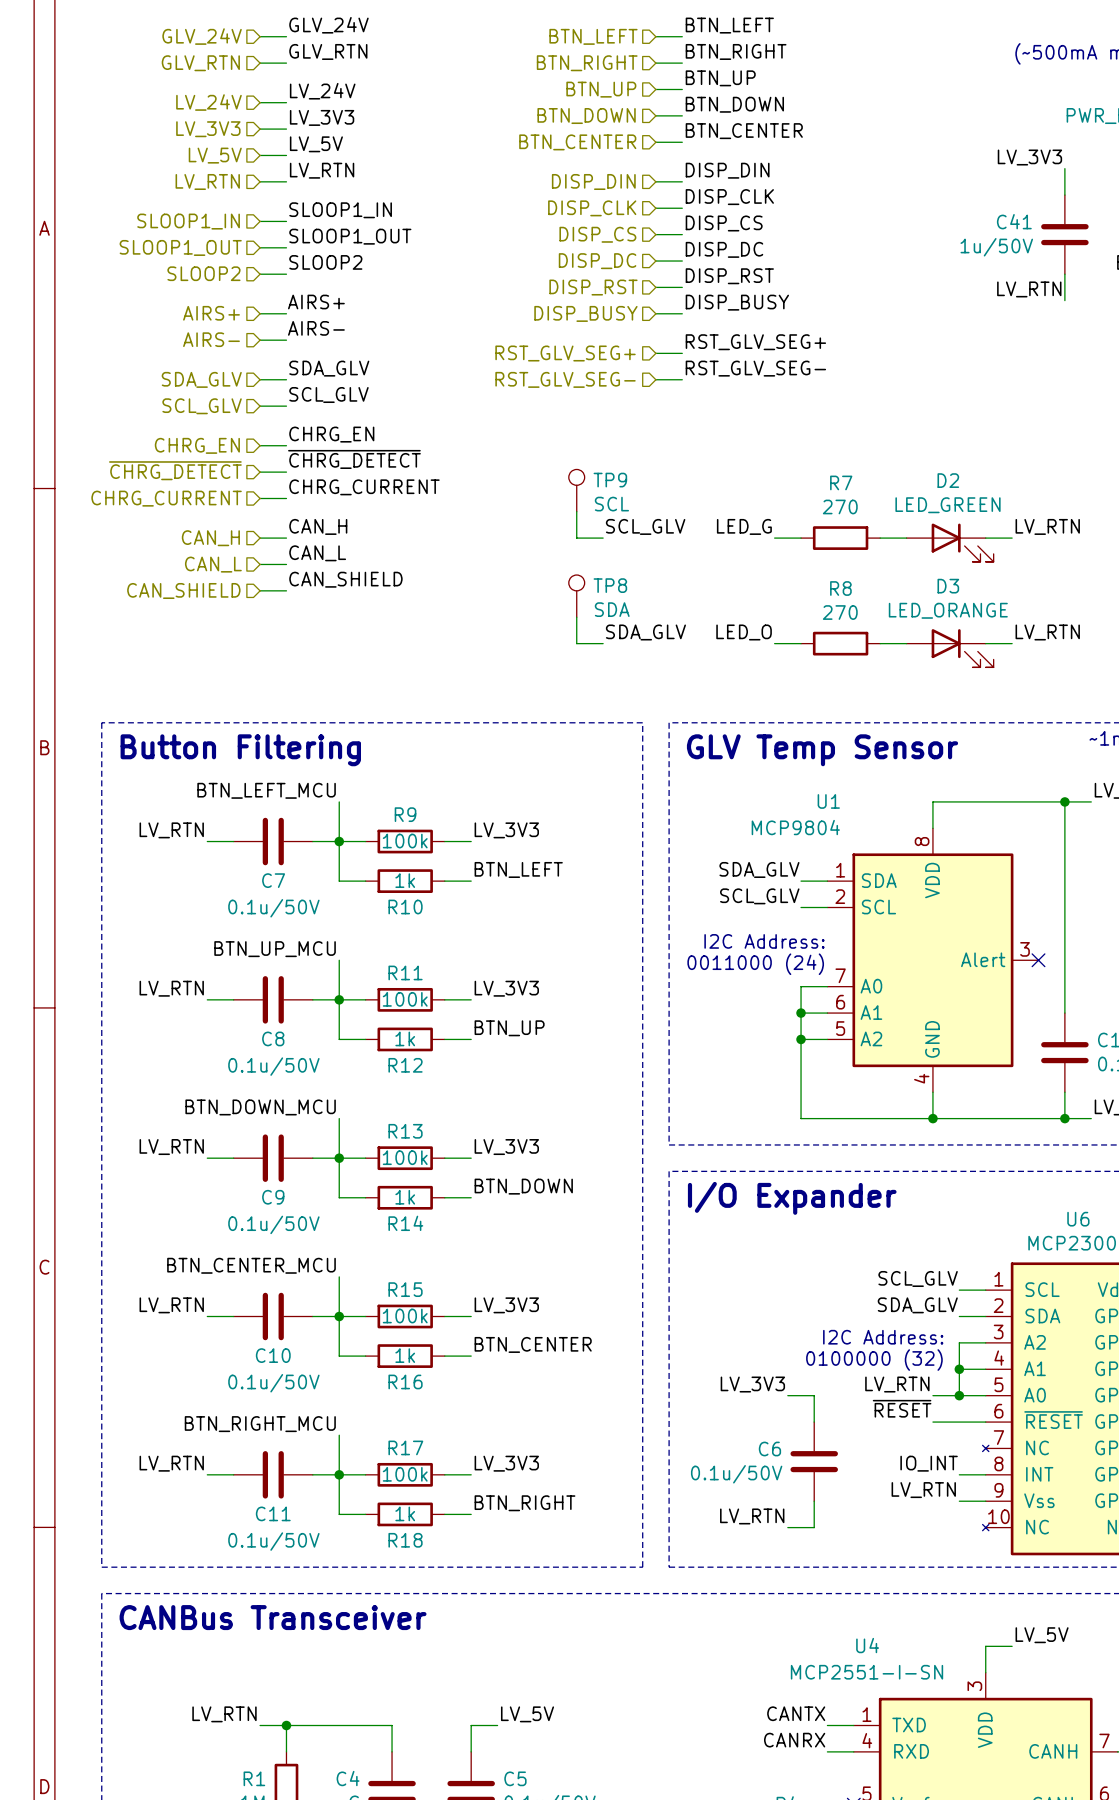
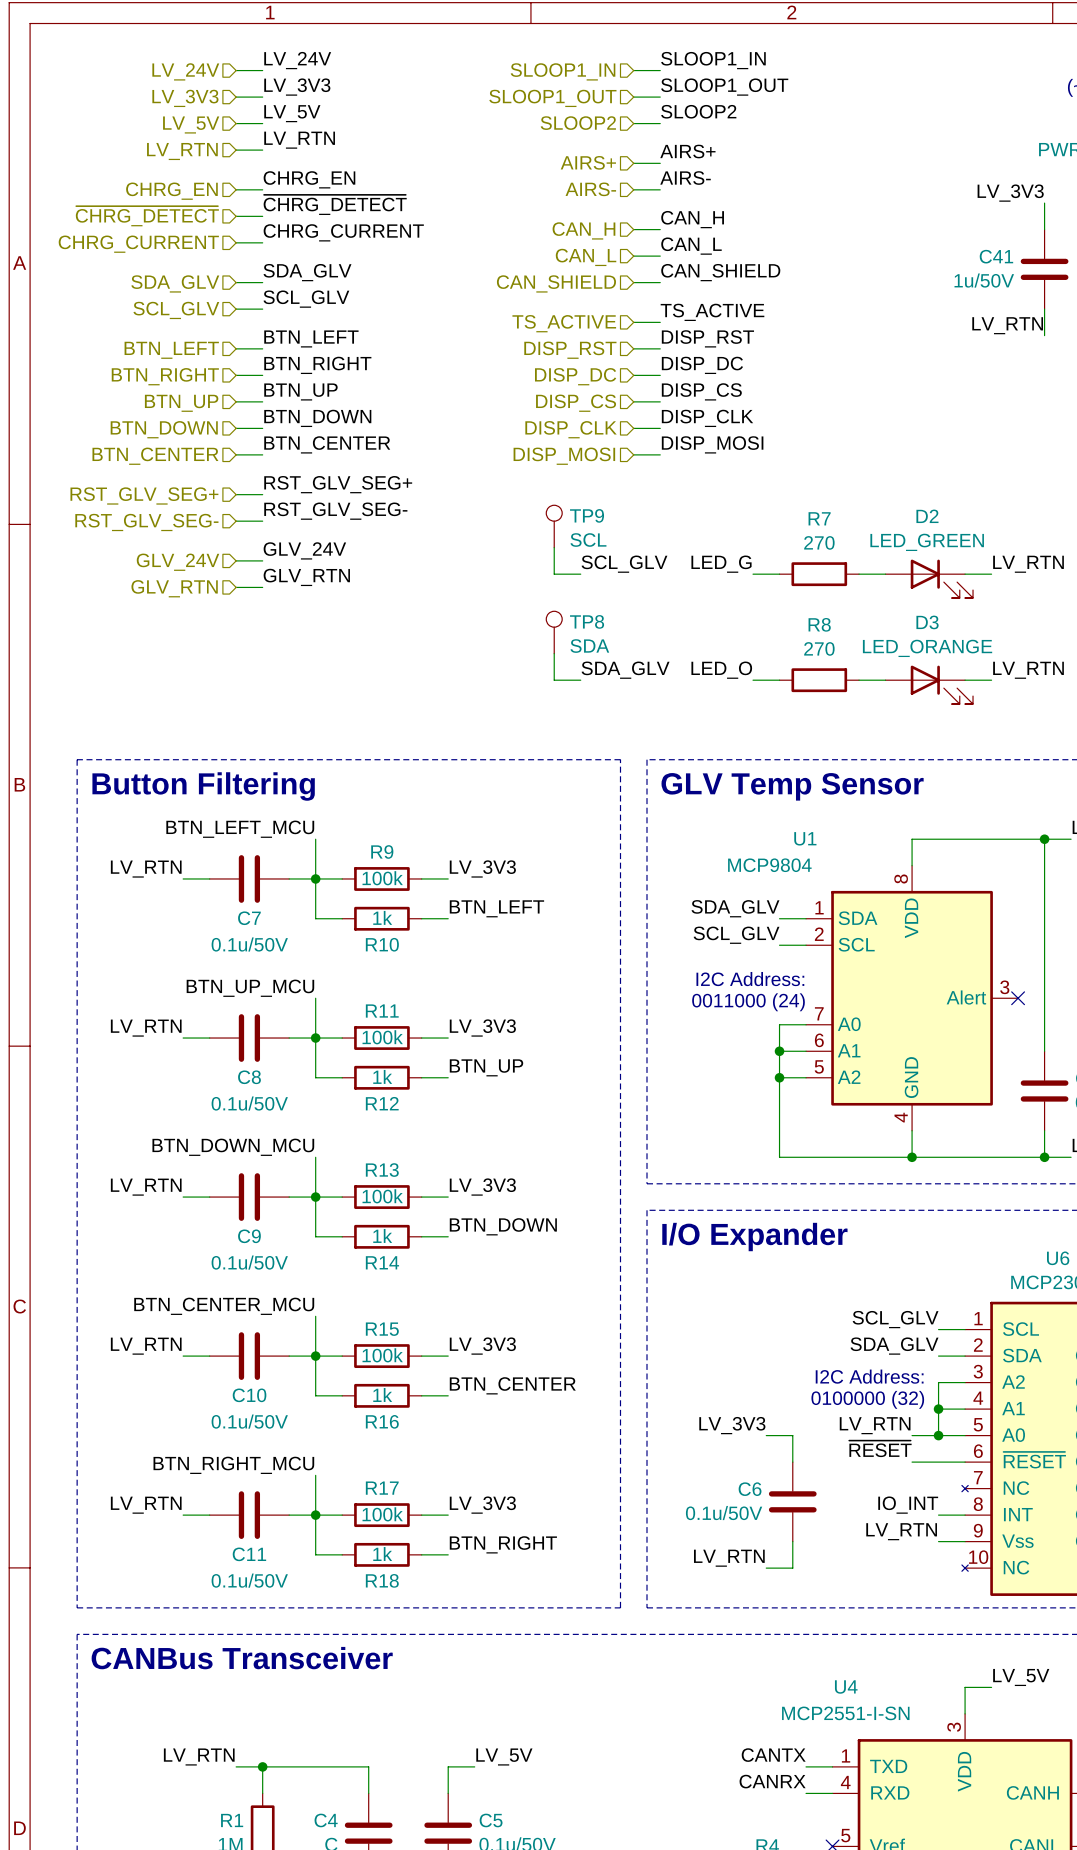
label: GLV_24V (328, 25) -> LV_24V (297, 60)
label: BTN_LEFT (729, 25) -> SLOOP1_IN (713, 60)
hierarchical label: GLV_24V (202, 36) -> LV_24V (185, 71)
hierarchical label: BTN_LEFT (593, 36) -> SLOOP1_IN (563, 71)
label: GLV_RTN (328, 51) -> LV_3V3 (297, 87)
label: BTN_RIGHT (736, 51) -> SLOOP1_OUT (724, 87)
hierarchical label: GLV_RTN (200, 63) -> LV_3V3 (185, 98)
hierarchical label: BTN_RIGHT (587, 63) -> SLOOP1_OUT (552, 98)
label: BTN_UP (720, 78) -> SLOOP2 (698, 111)
hierarchical label: BTN_UP (601, 89) -> SLOOP2 (578, 123)
label: LV_24V (322, 91) -> LV_5V (292, 113)
hierarchical label: LV_24V (208, 102) -> LV_5V (191, 125)
wire: (260, 102) (286, 102) -> (236, 123) (262, 123)
label: none -> LV_RTN (299, 140)
label: BTN_DOWN (734, 104) -> none
wire: (655, 115) (682, 115) -> (633, 189) (660, 189)
hierarchical label: none -> LV_RTN (182, 151)
hierarchical label: BTN_DOWN (586, 116) -> none
label: LV_3V3 (322, 117) -> none
label: none -> AIRS+ (687, 151)
hierarchical label: none -> AIRS+ (588, 162)
hierarchical label: LV_3V3 (208, 129) -> none
wire: (260, 129) (286, 129) -> (236, 150) (262, 150)
label: BTN_CENTER (744, 131) -> none
hierarchical label: BTN_CENTER (577, 142) -> none
wire: (655, 142) (682, 142) -> (633, 163) (660, 163)
label: none -> AIRS- (685, 178)
label: LV_5V (316, 144) -> CHRG_EN (309, 179)
hierarchical label: none -> AIRS- (590, 189)
hierarchical label: LV_5V (215, 155) -> CHRG_EN (171, 191)
label: LV_RTN (322, 170) -> ~{CHRG_DETECT} (335, 204)
label: DISP_DIN (727, 170) -> none
hierarchical label: LV_RTN (207, 181) -> ~{CHRG_DETECT} (147, 216)
hierarchical label: DISP_DIN (593, 181) -> none
wire: (655, 181) (682, 181) -> (633, 454) (660, 454)
label: none -> CAN_H (692, 219)
hierarchical label: none -> CAN_H (583, 230)
label: none -> CHRG_CURRENT (343, 232)
label position: DISP_CLK (729, 197) -> DISP_CLK (707, 418)
hierarchical label: none -> CHRG_CURRENT (138, 244)
hierarchical label position: DISP_CLK (592, 208) -> DISP_CLK (571, 429)
wire: (655, 208) (682, 208) -> (633, 229) (660, 229)
label: SLOOP1_IN (340, 210) -> none
label: none -> CAN_L (691, 246)
hierarchical label: SLOOP1_IN (188, 221) -> none
wire: (260, 221) (286, 221) -> (236, 242) (262, 242)
hierarchical label: none -> CAN_L (586, 257)
label position: DISP_CS (724, 223) -> DISP_CS (701, 391)
hierarchical label position: DISP_CS (597, 234) -> DISP_CS (576, 403)
wire: (655, 234) (682, 234) -> (633, 256) (660, 256)
label: SLOOP1_OUT (350, 236) -> SDA_GLV (307, 272)
label: none -> CAN_SHIELD (720, 272)
hierarchical label: SLOOP1_OUT (180, 247) -> SDA_GLV (175, 283)
hierarchical label: none -> CAN_SHIELD (556, 283)
label position: DISP_DC (724, 249) -> DISP_DC (702, 365)
hierarchical label position: DISP_DC (597, 261) -> DISP_DC (575, 376)
wire: (655, 261) (682, 261) -> (633, 282) (660, 282)
label: SLOOP2 (325, 262) -> SCL_GLV (306, 299)
hierarchical label: SLOOP2 (203, 273) -> SCL_GLV (176, 310)
label: DISP_RST (729, 276) -> TS_ACTIVE (712, 312)
hierarchical label: DISP_RST (593, 287) -> TS_ACTIVE (564, 323)
label: AIRS+ (316, 302) -> BTN_LEFT (311, 338)
label: DISP_BUSY (737, 302) -> DISP_RST (707, 338)
hierarchical label: AIRS+ (211, 313) -> BTN_LEFT (171, 350)
hierarchical label: DISP_BUSY (585, 313) -> DISP_RST (570, 350)
label: AIRS- (316, 328) -> BTN_RIGHT (317, 365)
hierarchical label: AIRS- (211, 339) -> BTN_RIGHT (165, 376)
label: RST_GLV_SEG+ (755, 342) -> none
hierarchical label: RST_GLV_SEG+ (565, 353) -> none
wire: (655, 353) (682, 353) -> (633, 375) (660, 375)
label: none -> BTN_UP (300, 391)
hierarchical label: none -> BTN_UP (181, 403)
label: SDA_GLV (329, 368) -> none
label: RST_GLV_SEG- (755, 368) -> none
hierarchical label: SDA_GLV (201, 379) -> none
wire: (260, 379) (286, 379) -> (236, 401) (262, 401)
hierarchical label: RST_GLV_SEG- (565, 379) -> none
wire: (655, 379) (682, 379) -> (633, 401) (660, 401)
label: none -> BTN_DOWN (317, 418)
wire: none -> (633, 428) (660, 428)
hierarchical label: none -> BTN_DOWN (164, 429)
label: SCL_GLV (328, 394) -> none
hierarchical label: SCL_GLV (202, 406) -> none
wire: (260, 406) (286, 406) -> (236, 428) (262, 428)
label: none -> BTN_CENTER (327, 444)
label: none -> DISP_MOSI (712, 444)
hierarchical label: none -> BTN_CENTER (155, 456)
hierarchical label: none -> DISP_MOSI (564, 456)
label: CHRG_EN (331, 434) -> none
hierarchical label: CHRG_EN (197, 445) -> none
wire: (260, 445) (286, 445) -> none
label: none -> RST_GLV_SEG+ (338, 484)
hierarchical label: none -> RST_GLV_SEG+ (144, 495)
label: ~{CHRG_DETECT} (354, 459) -> none
hierarchical label: ~{CHRG_DETECT} (175, 470) -> none
wire: (260, 472) (286, 472) -> (236, 494) (262, 494)
label: none -> RST_GLV_SEG- (335, 511)
hierarchical label: none -> RST_GLV_SEG- (146, 522)
label: CHRG_CURRENT (364, 487) -> none
hierarchical label: CHRG_CURRENT (166, 498) -> none
wire: (260, 498) (286, 498) -> (236, 521) (262, 521)
label: none -> GLV_24V (304, 550)
hierarchical label: none -> GLV_24V (178, 562)
label: CAN_H (318, 526) -> none
hierarchical label: CAN_H (210, 538) -> none
wire: (260, 538) (286, 538) -> (236, 560) (262, 560)
label: none -> GLV_RTN (306, 577)
hierarchical label: none -> GLV_RTN (174, 588)
label: CAN_L (317, 553) -> none
hierarchical label: CAN_L (213, 564) -> none
wire: (260, 564) (286, 564) -> (236, 587) (262, 587)
label: CAN_SHIELD (345, 579) -> none
hierarchical label: CAN_SHIELD (183, 590) -> none
wire: (260, 590) (286, 590) -> (236, 454) (262, 454)

